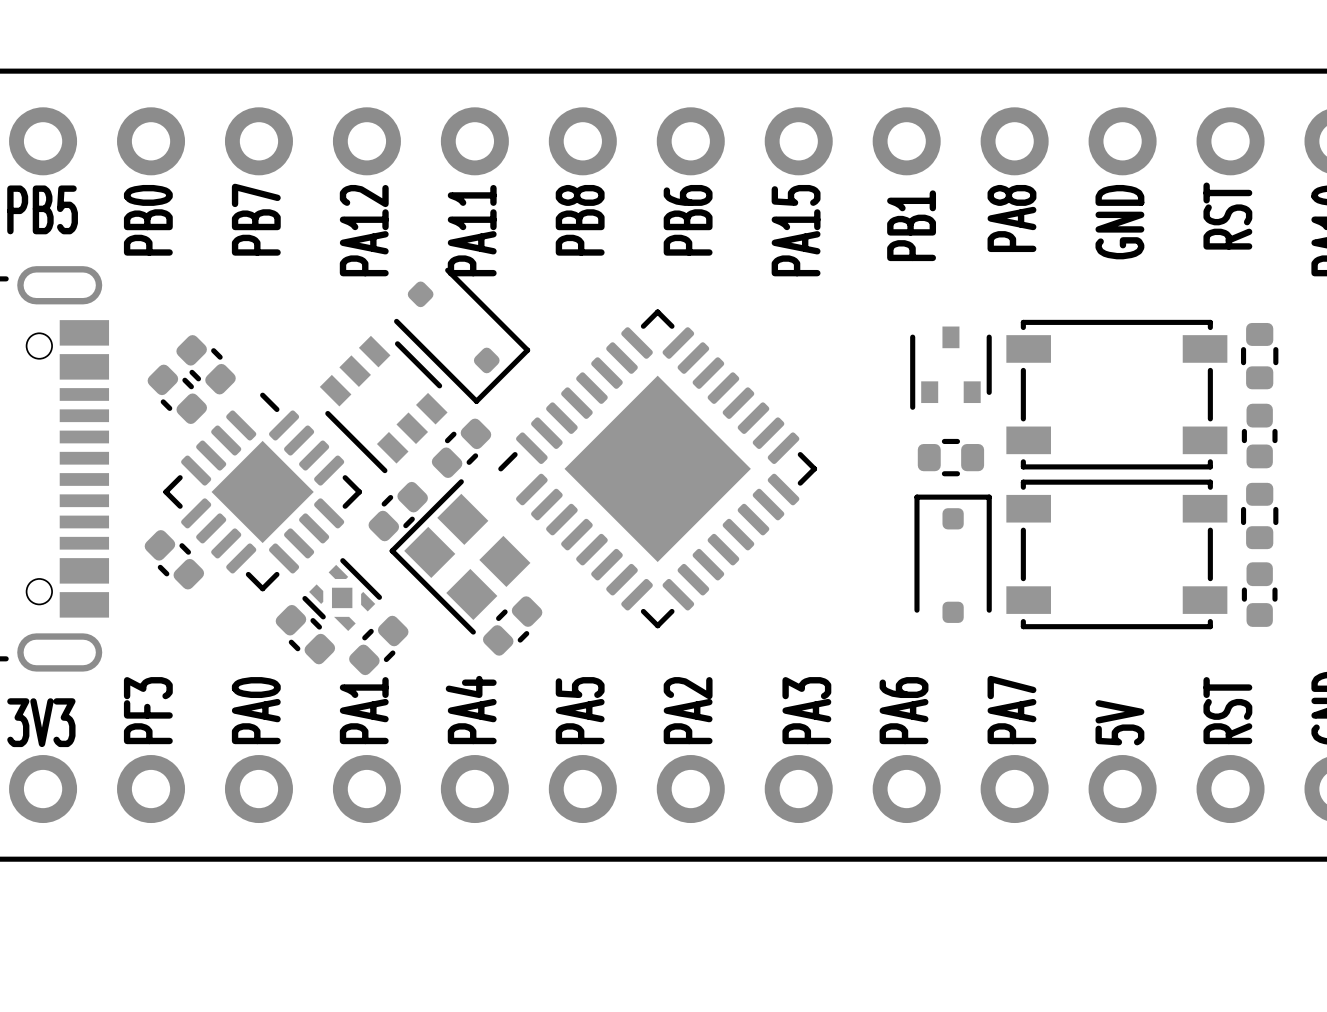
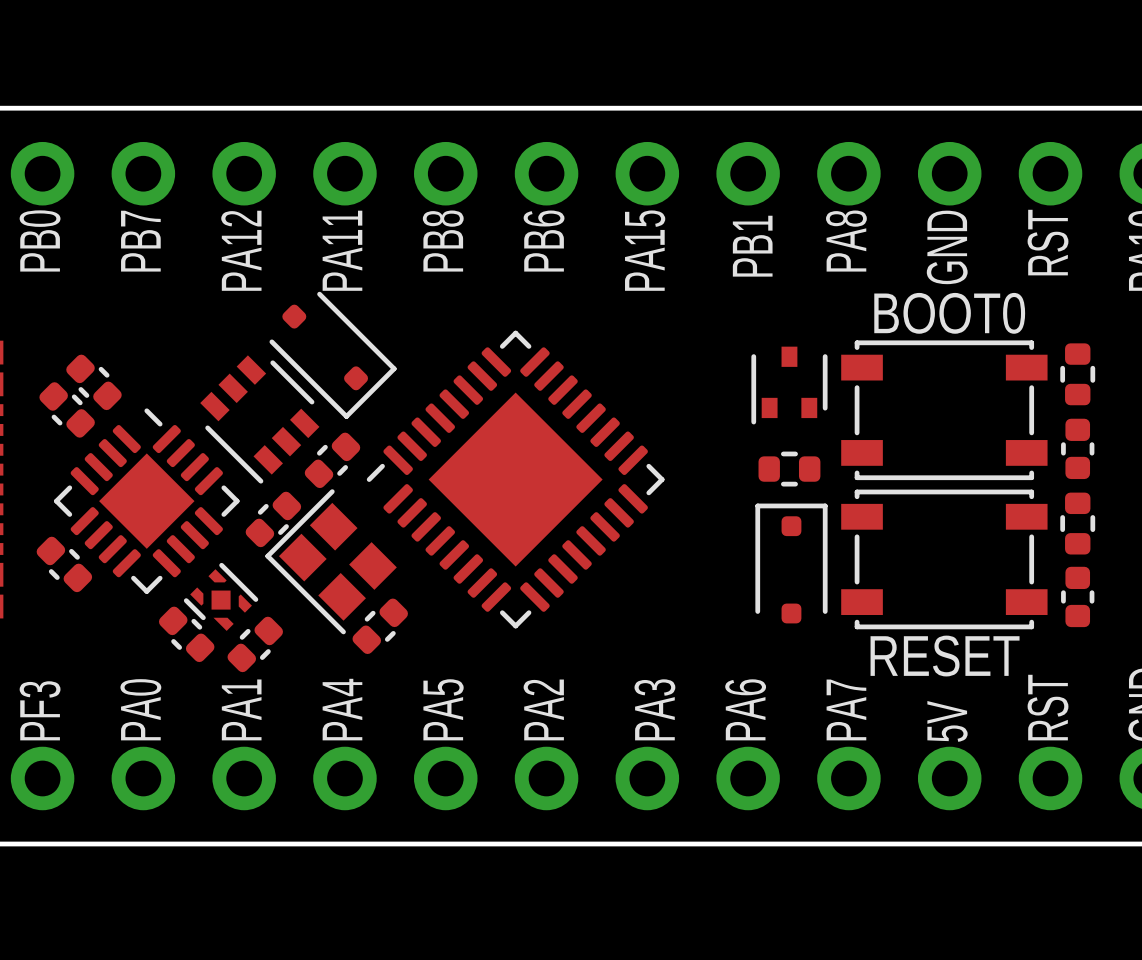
text: none -> BOOT0 (949, 313)
text: none -> RESET (945, 656)

